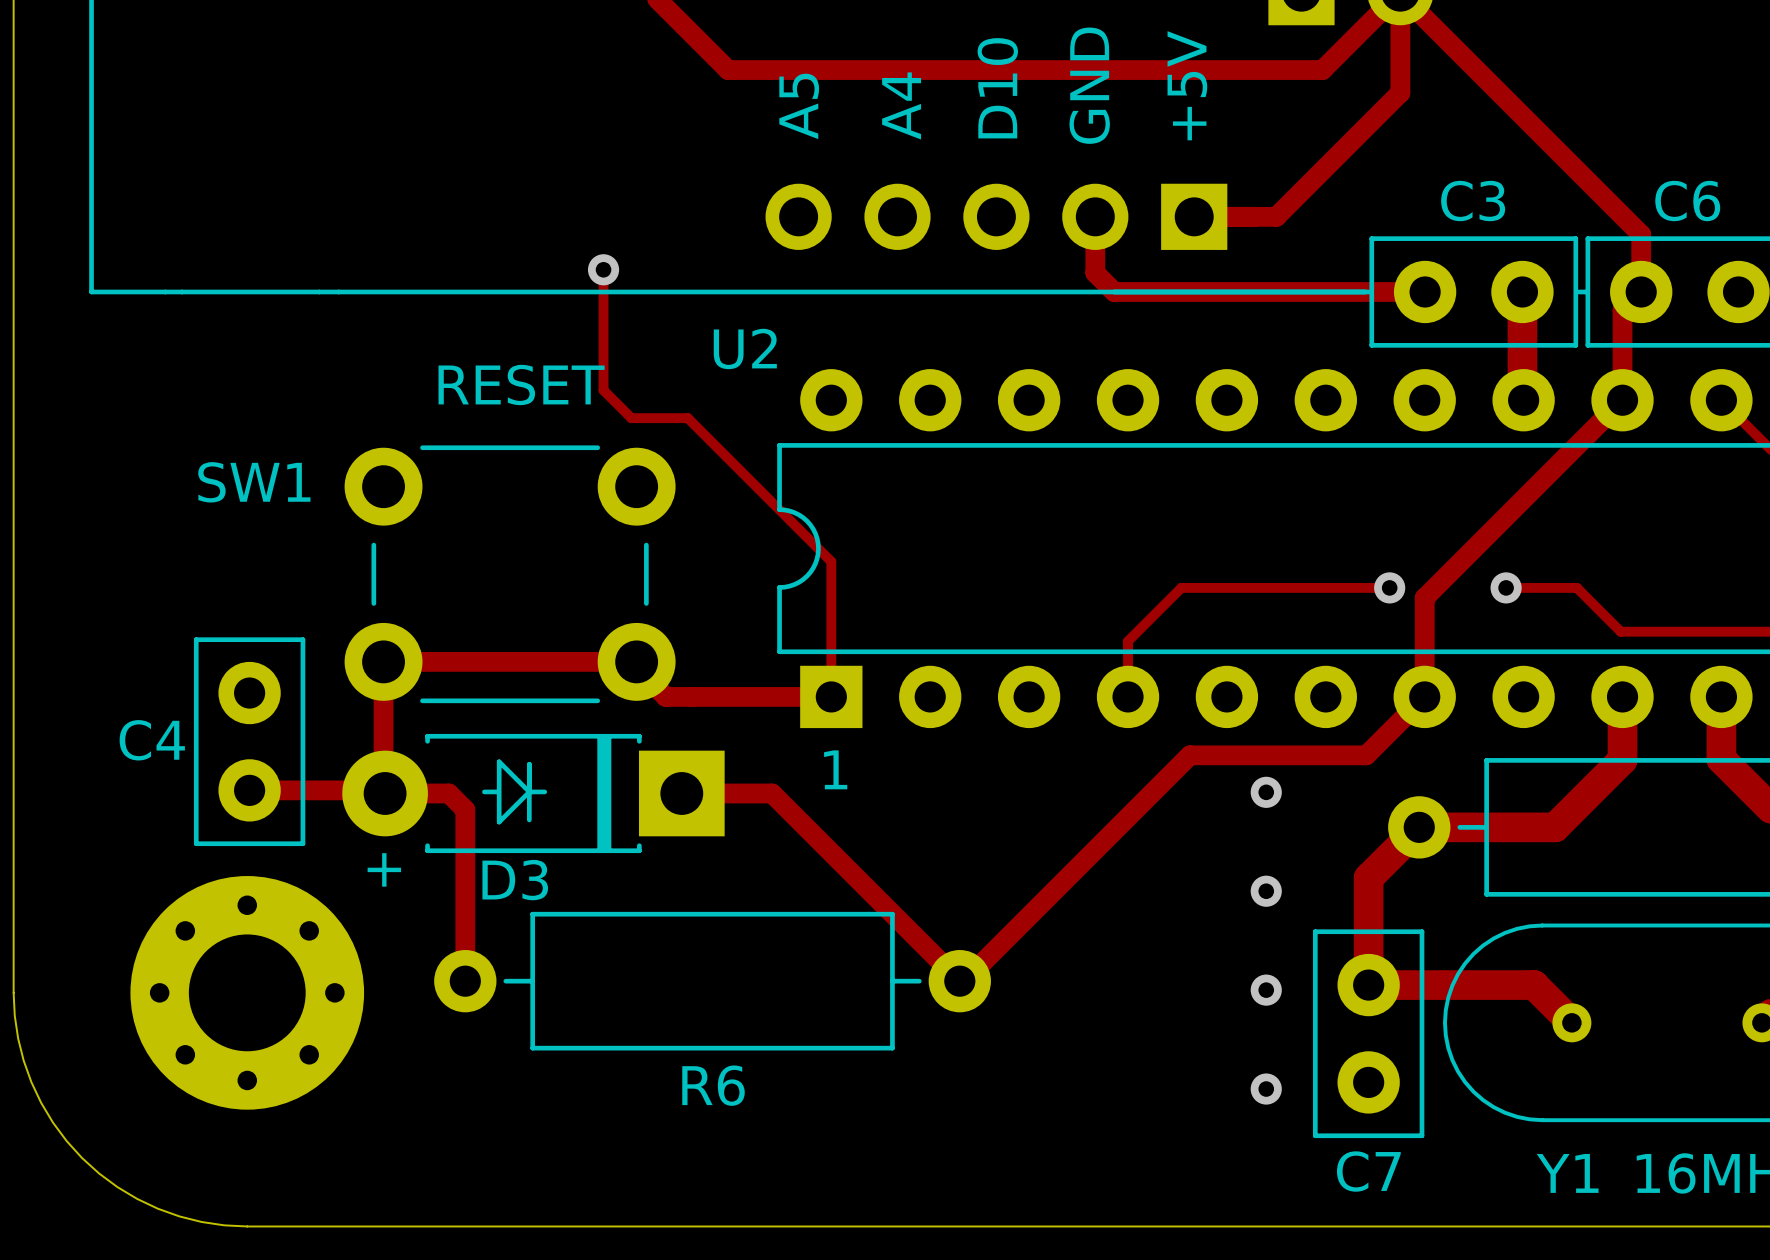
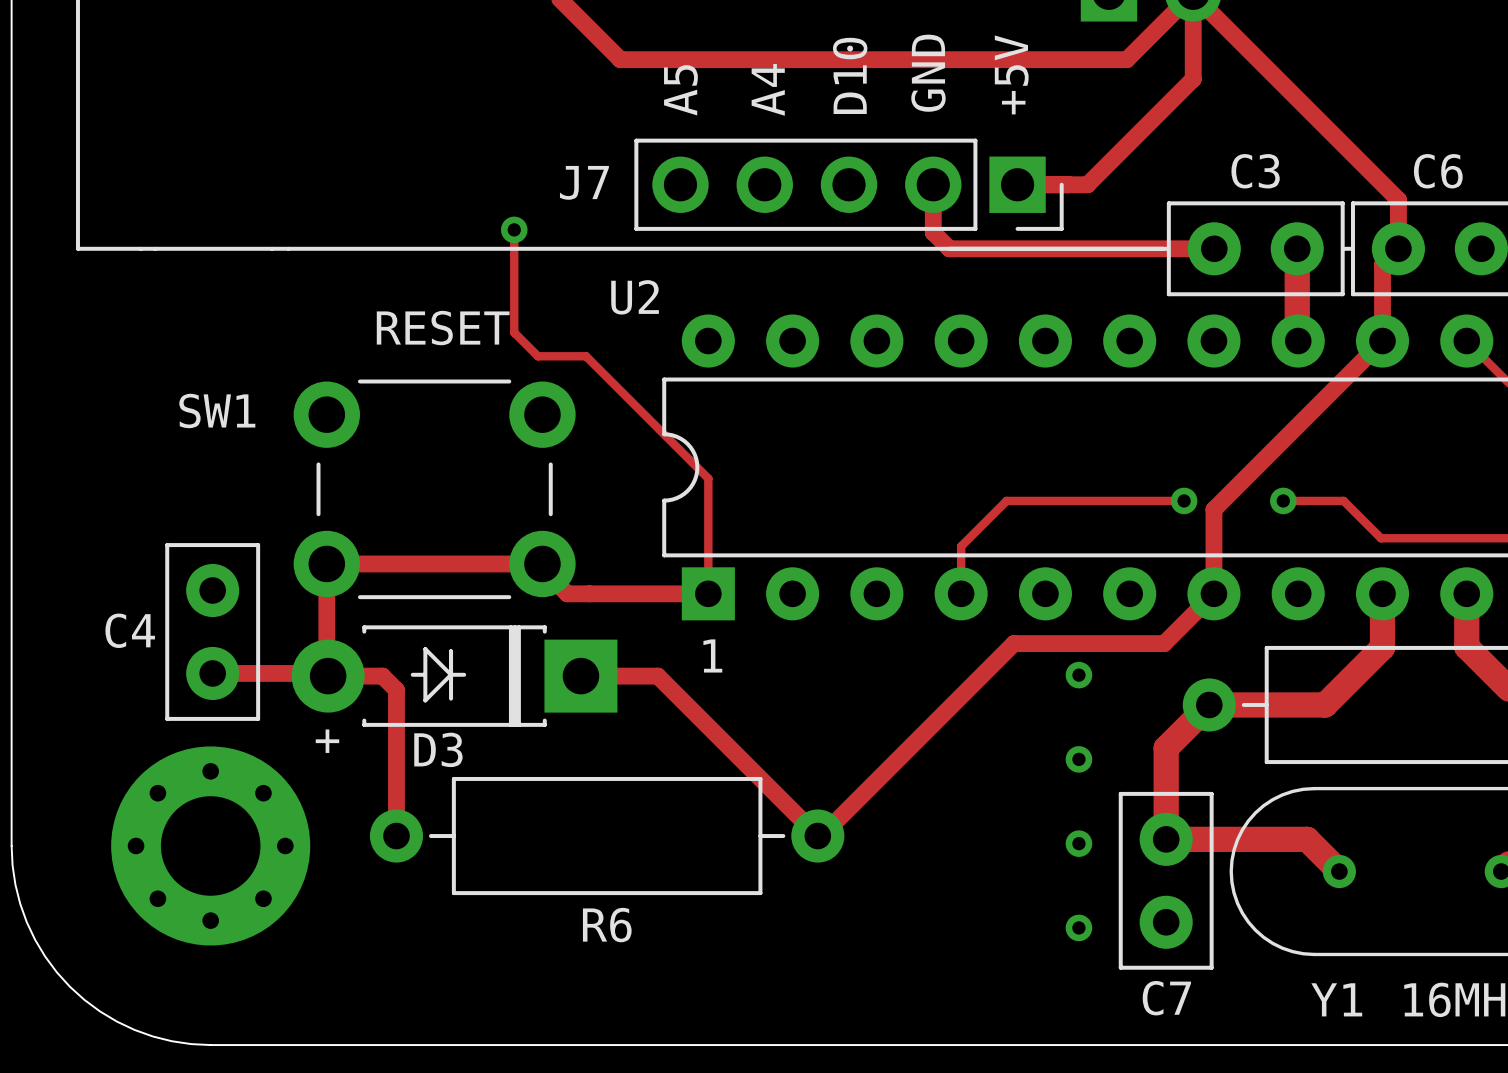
J7 side: bottom (996, 216) -> top (849, 184)

